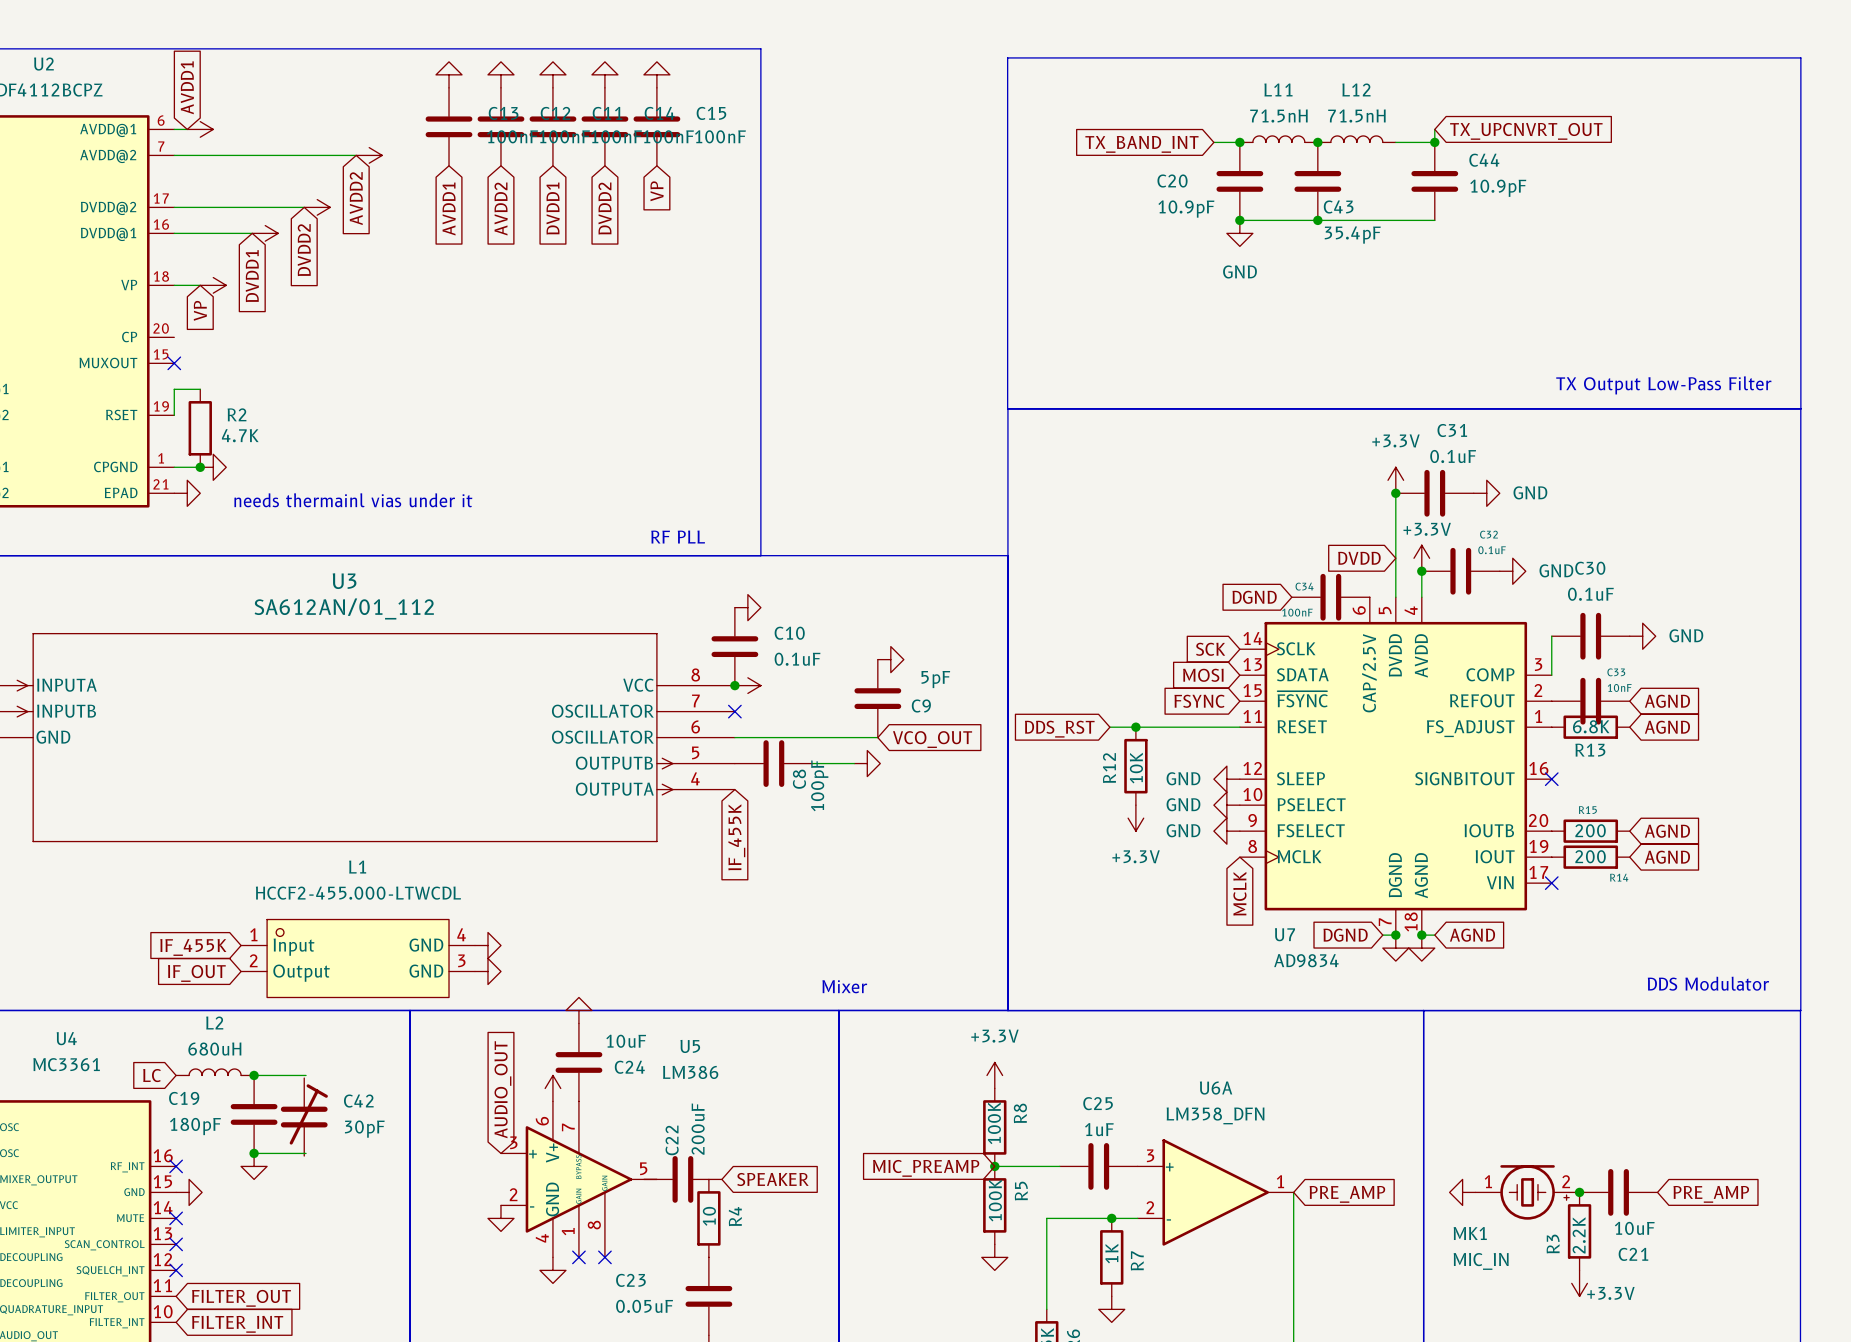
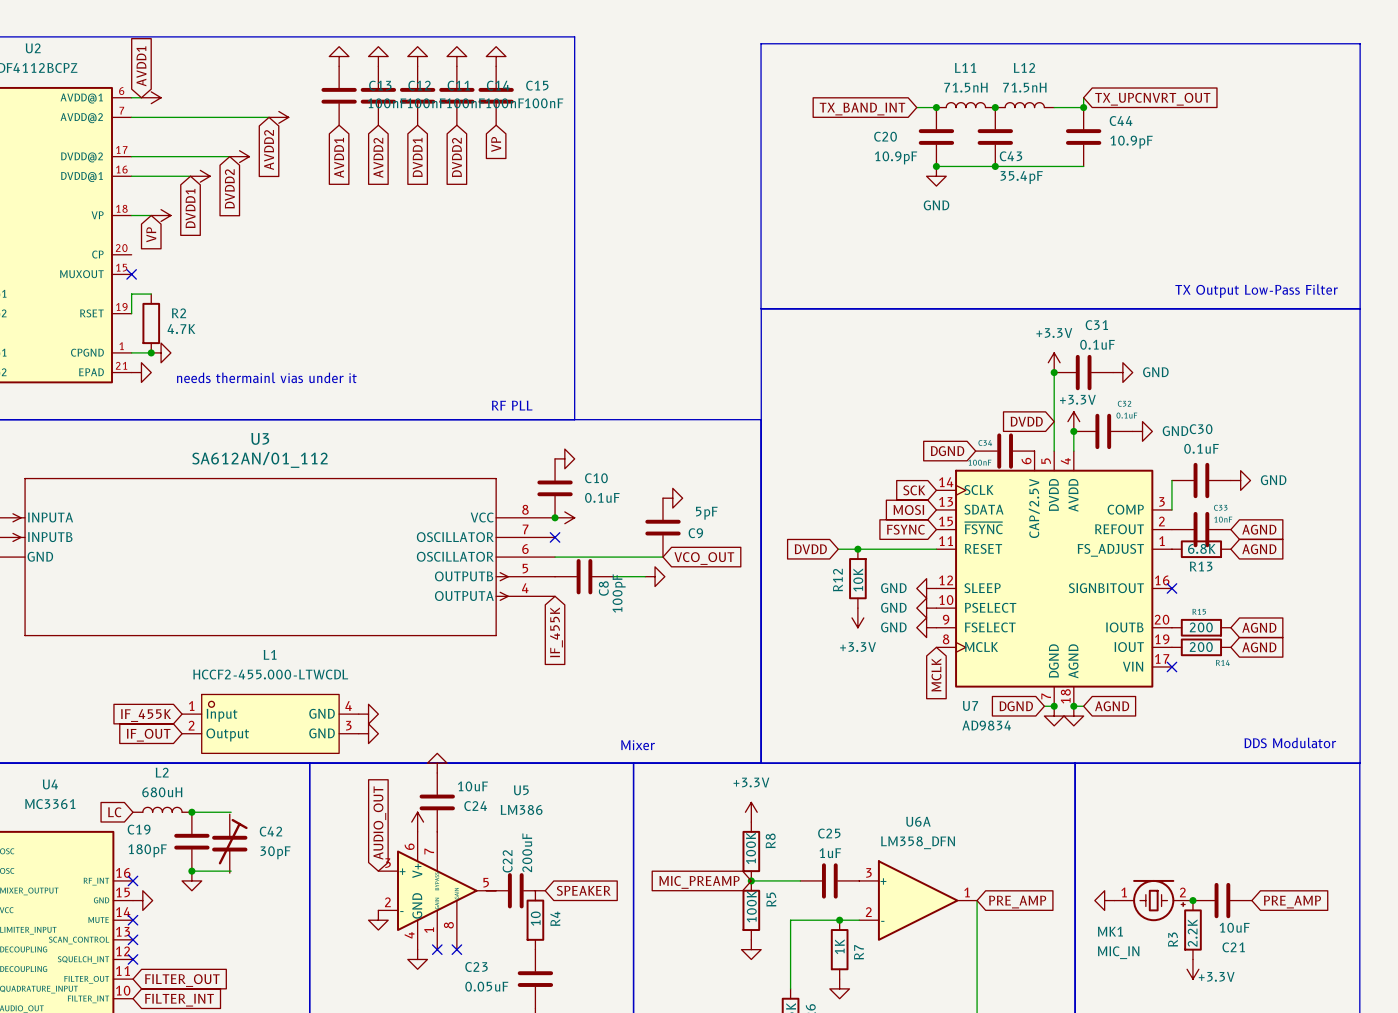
global label: DDS_RST (1059, 729) -> DVDD (810, 549)

